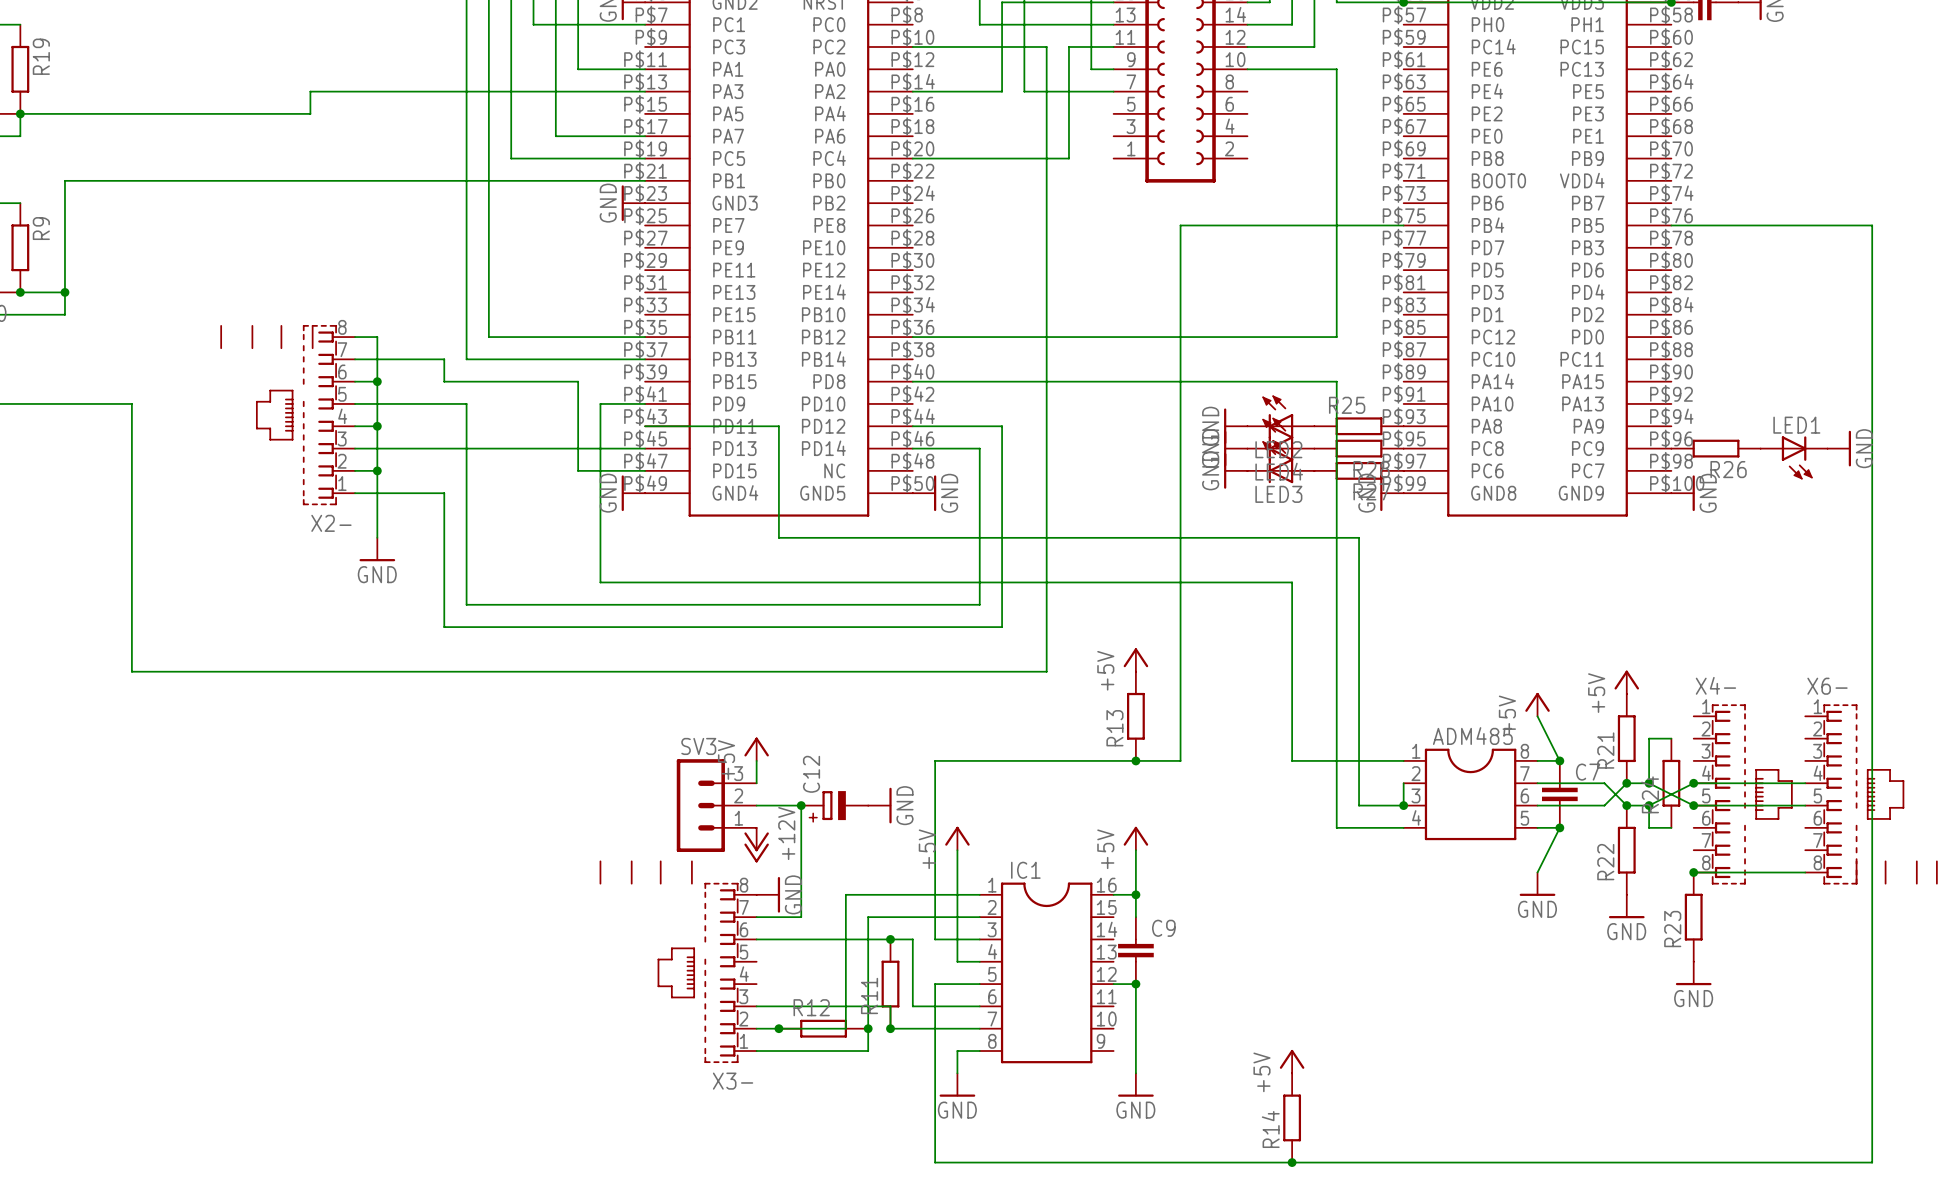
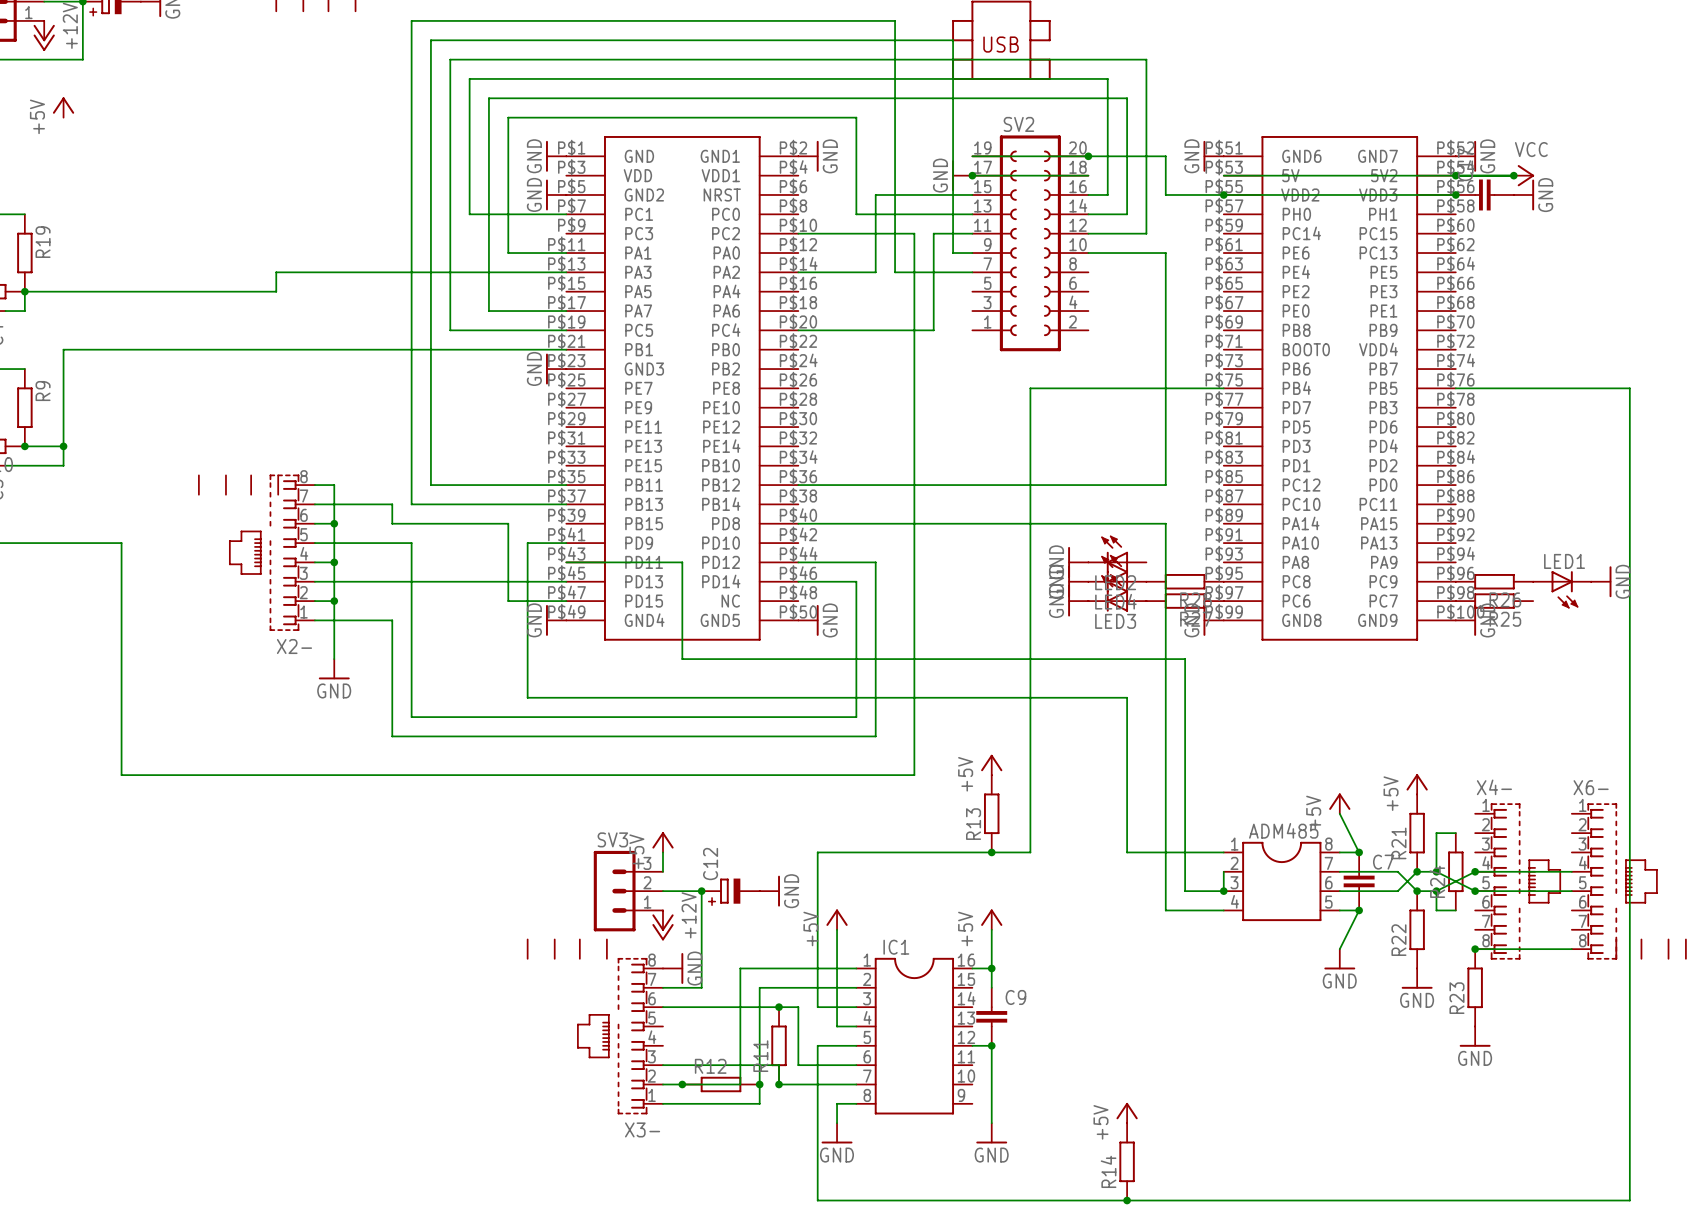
R25 name position: R25 (1347, 405) -> R25 (1505, 619)
R25 position: (1359, 426) -> (1494, 601)

